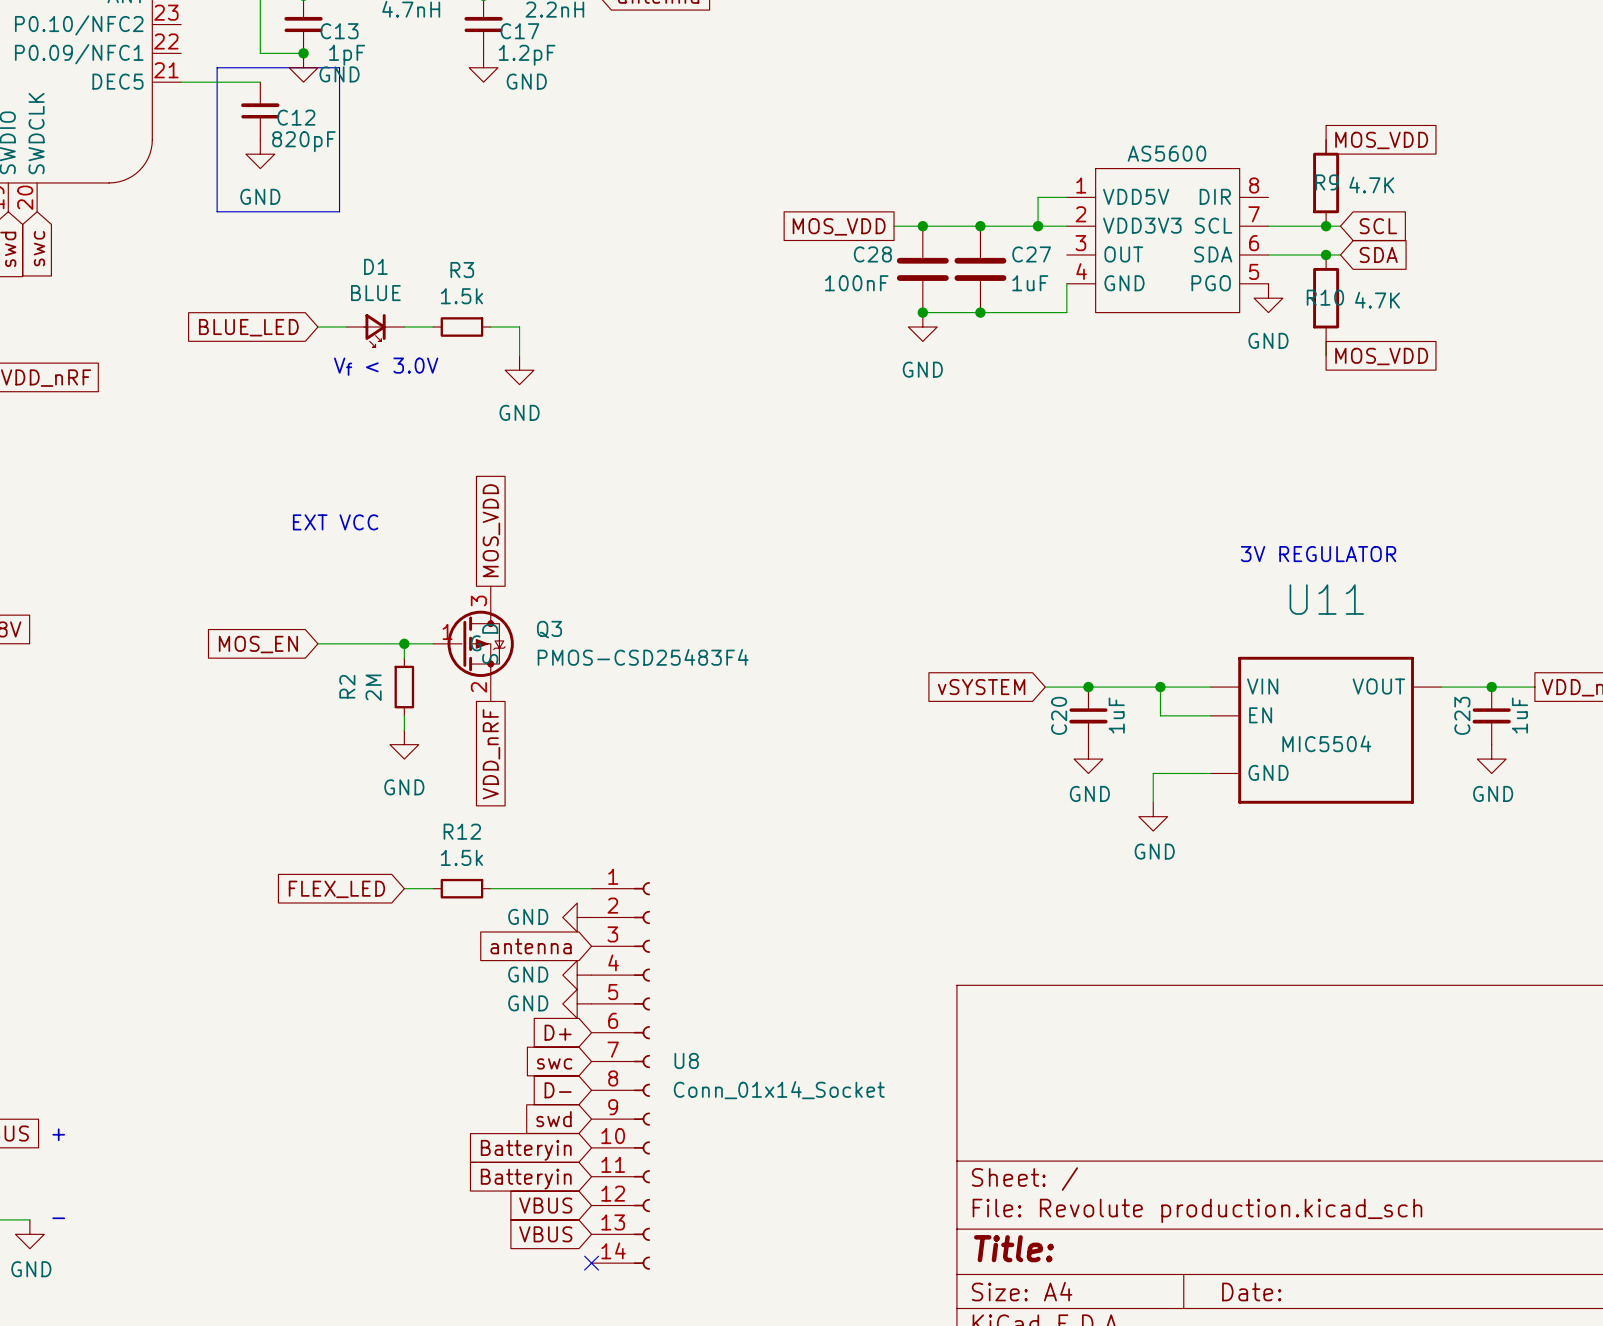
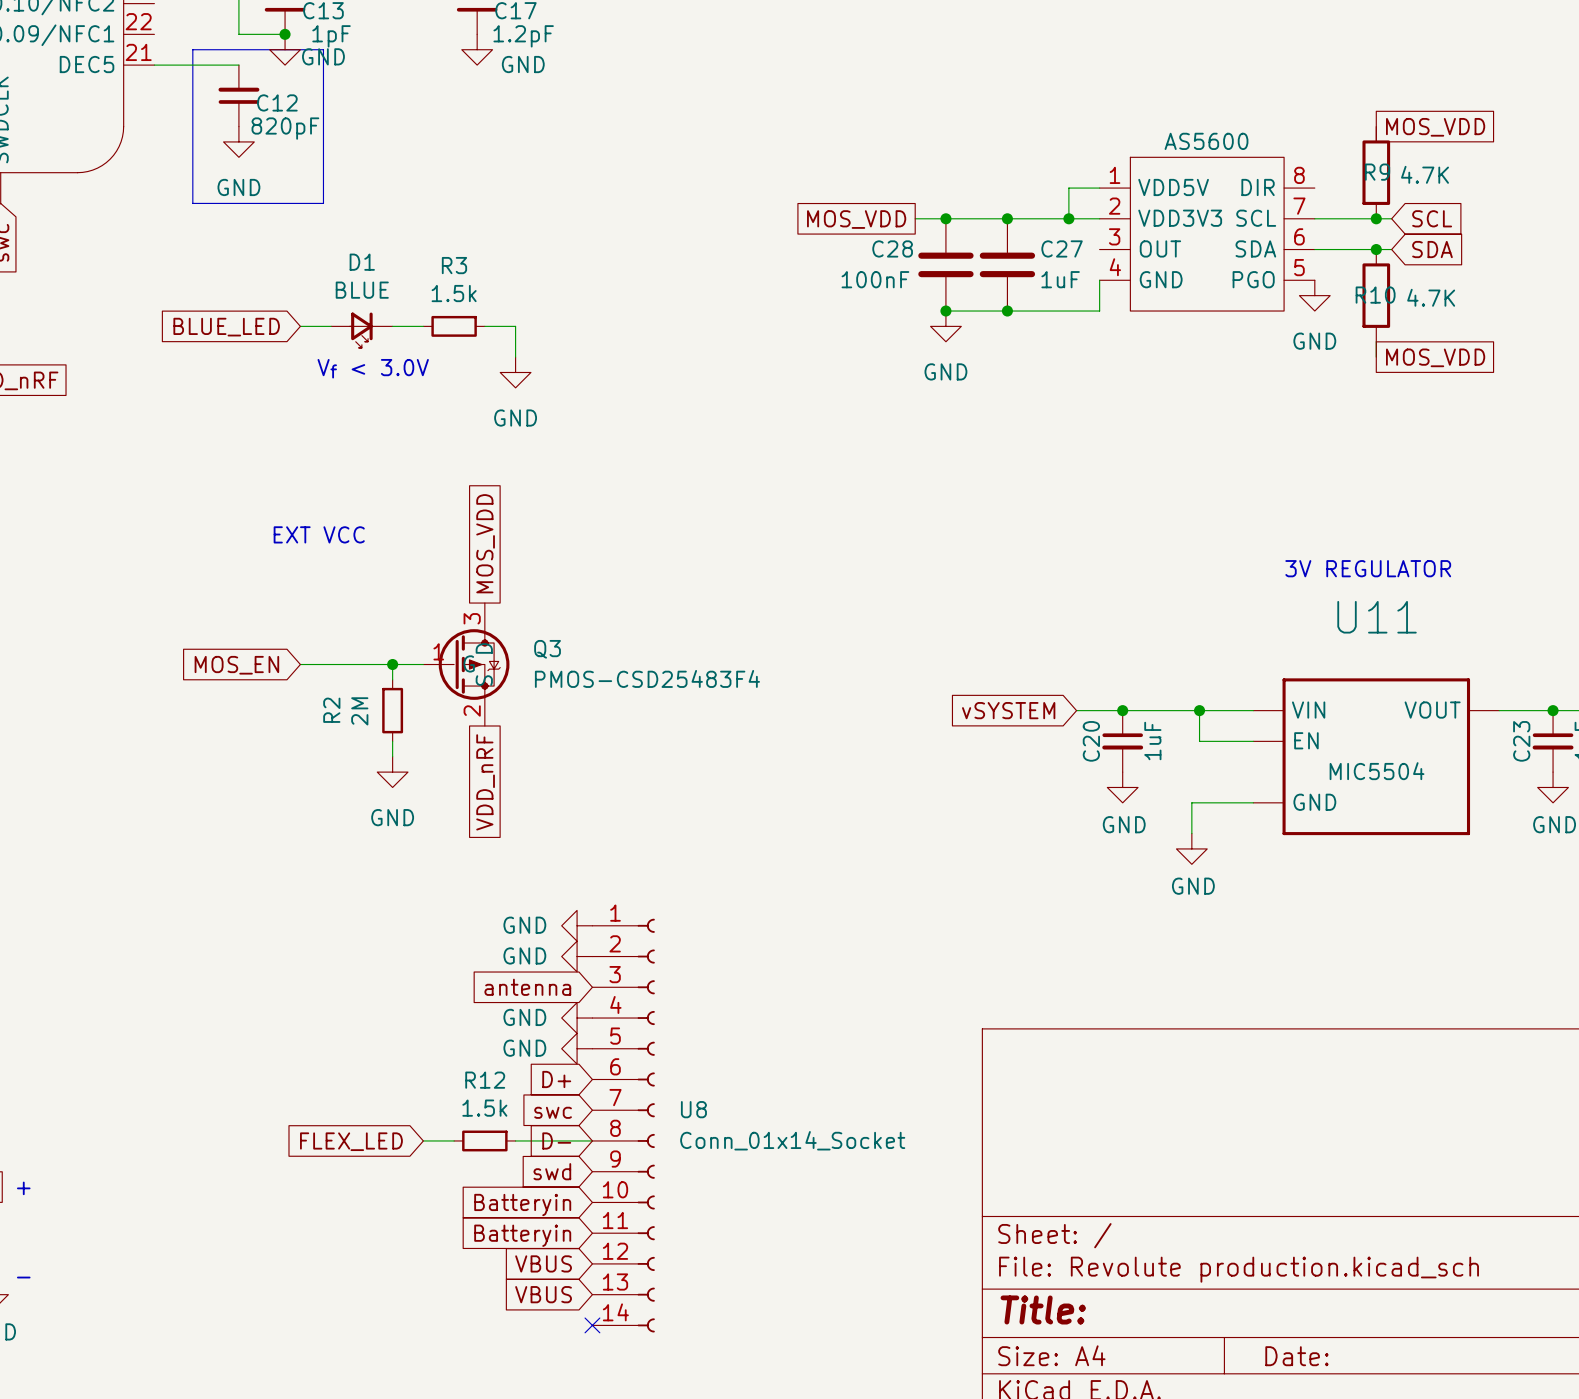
wire: (404, 888) (433, 888) -> (423, 1140) (454, 1140)
R12 position: (461, 888) -> (484, 1140)
wire: (490, 888) (591, 888) -> none
power symbol: none -> GND (577, 925)
global label position: FLEX_LED (336, 889) -> FLEX_LED (351, 1141)
wire: none -> (515, 1140) (592, 1140)

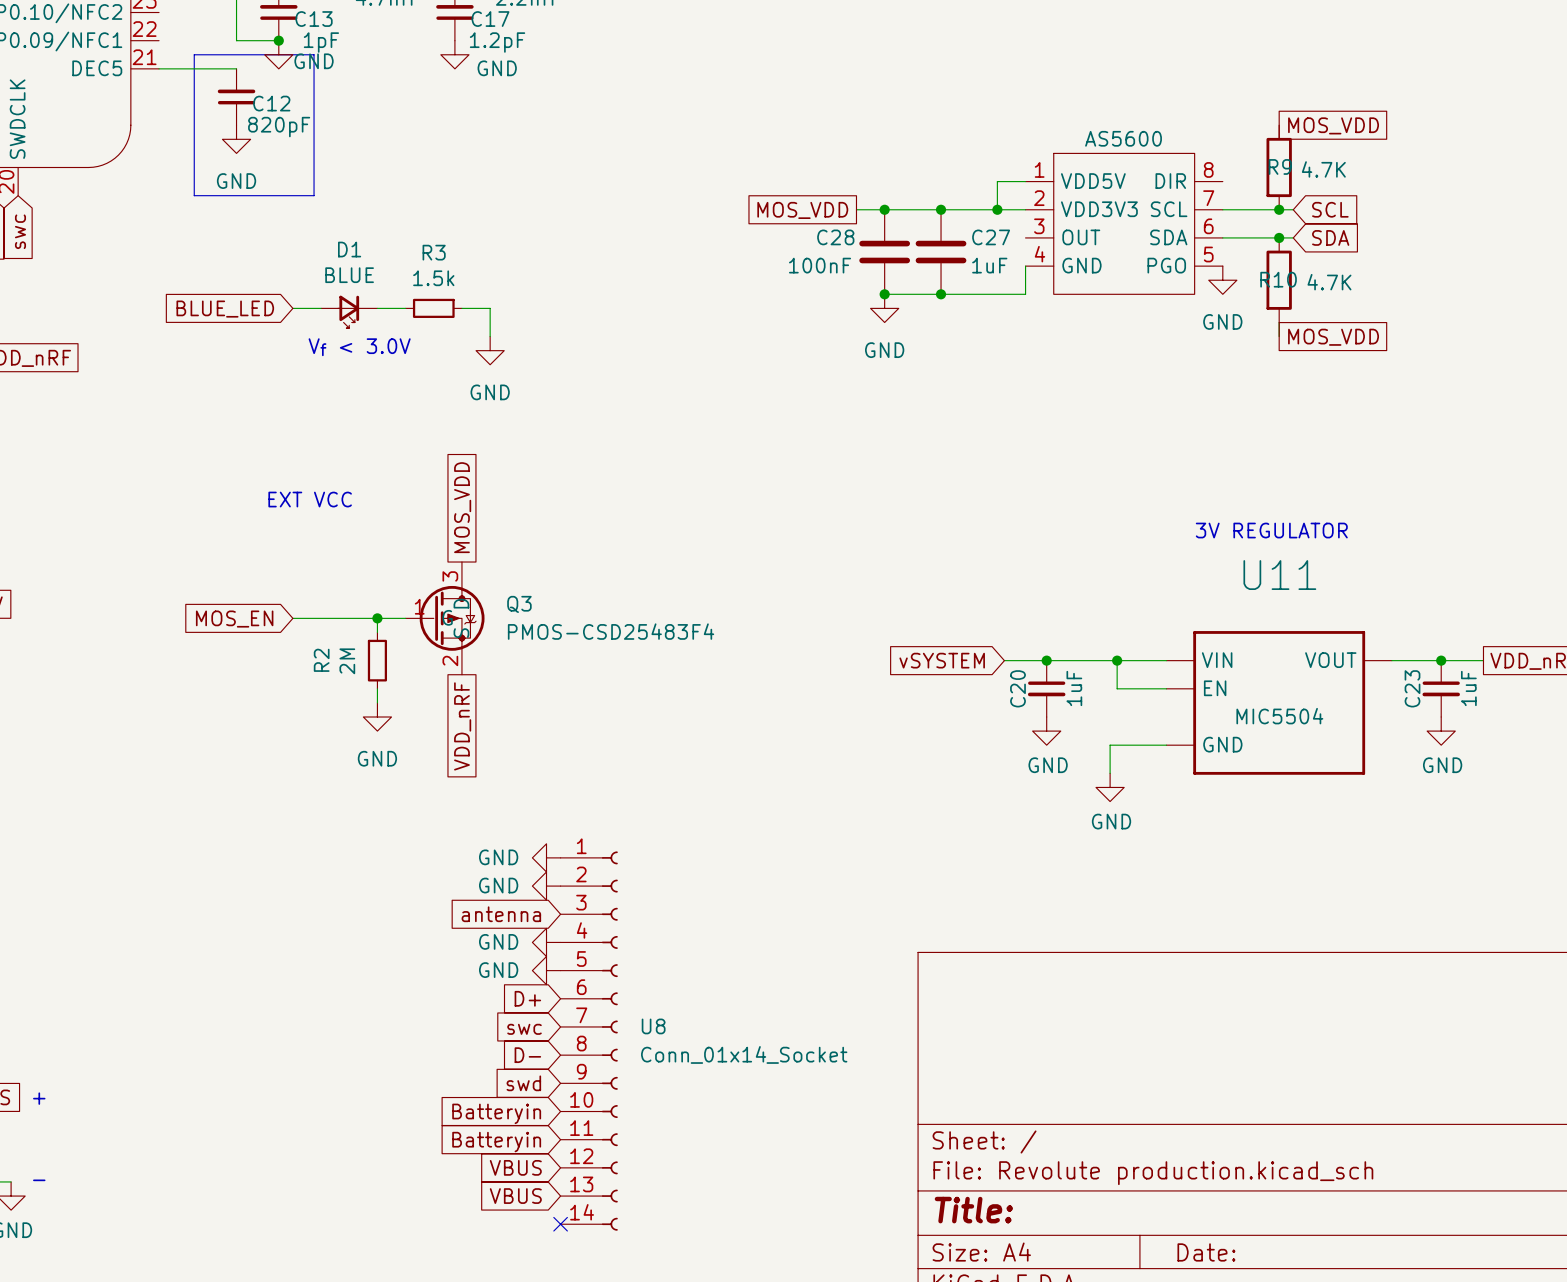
wire: (423, 1140) (454, 1140) -> none
R12: 1.5k (484, 1140) -> none
wire: (515, 1140) (592, 1140) -> none
global label: FLEX_LED (351, 1141) -> none

